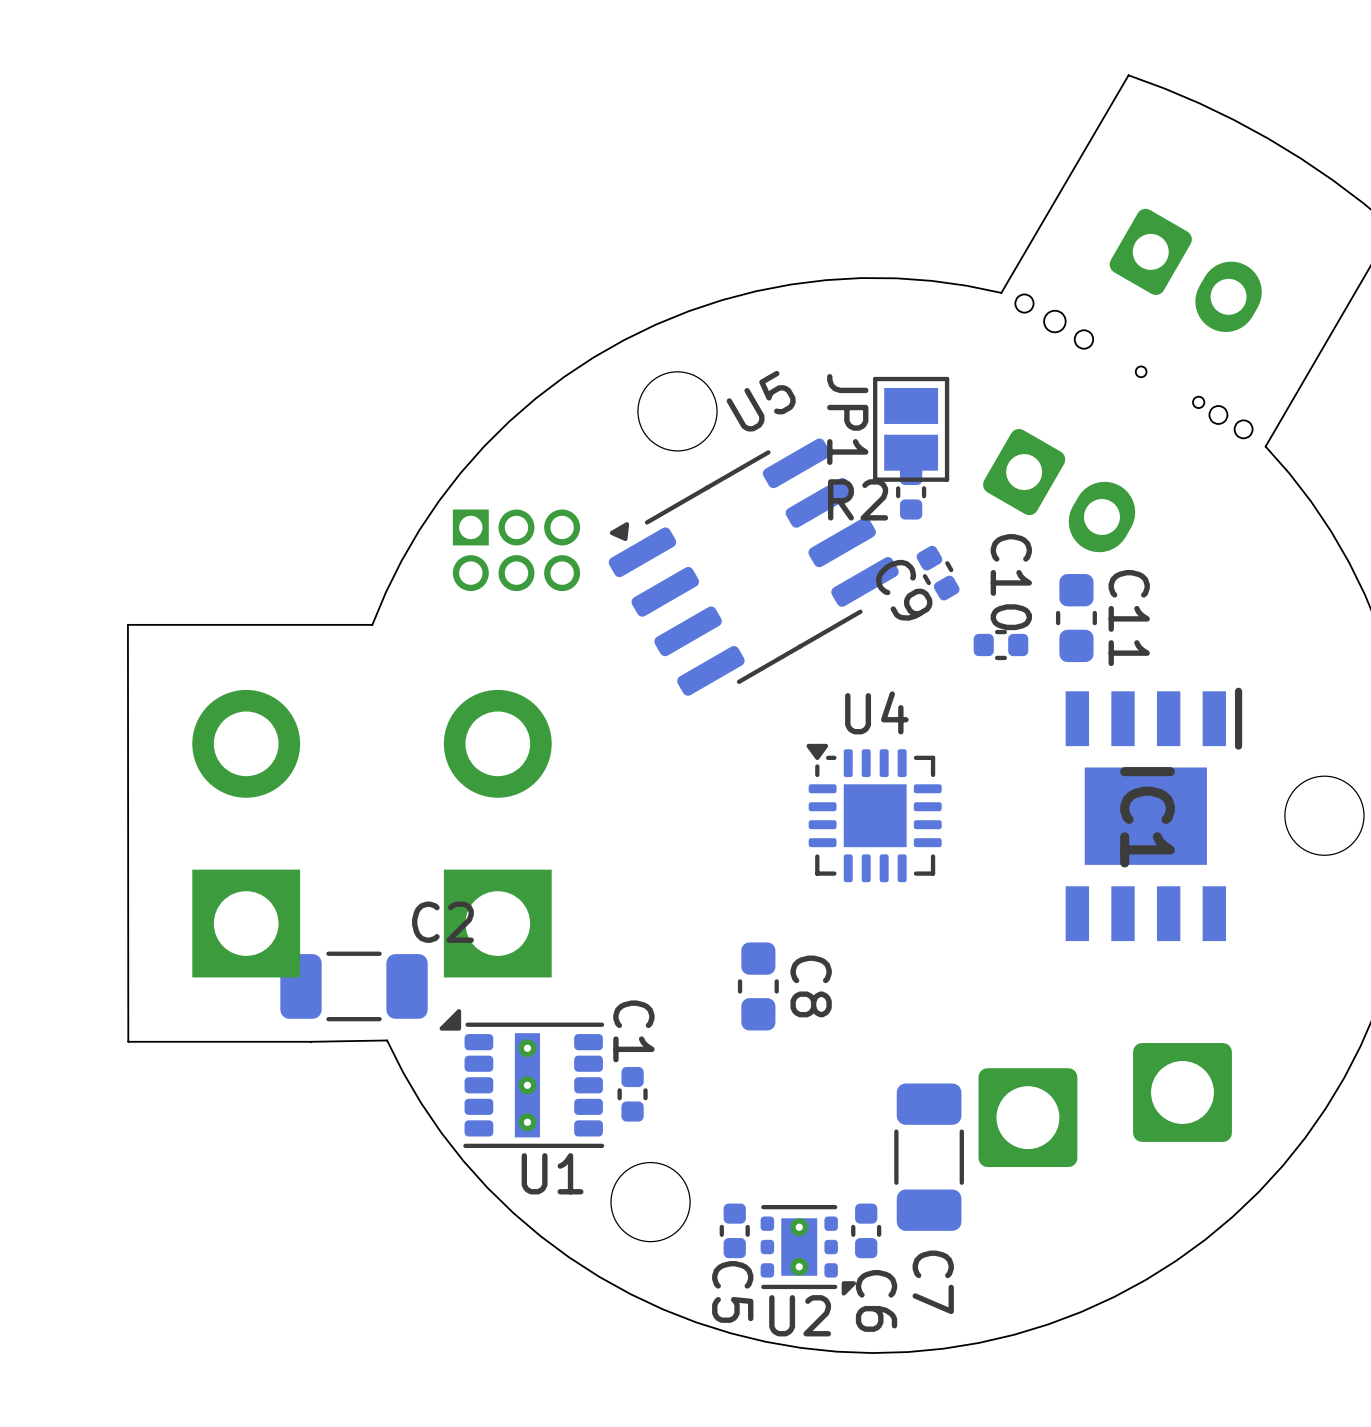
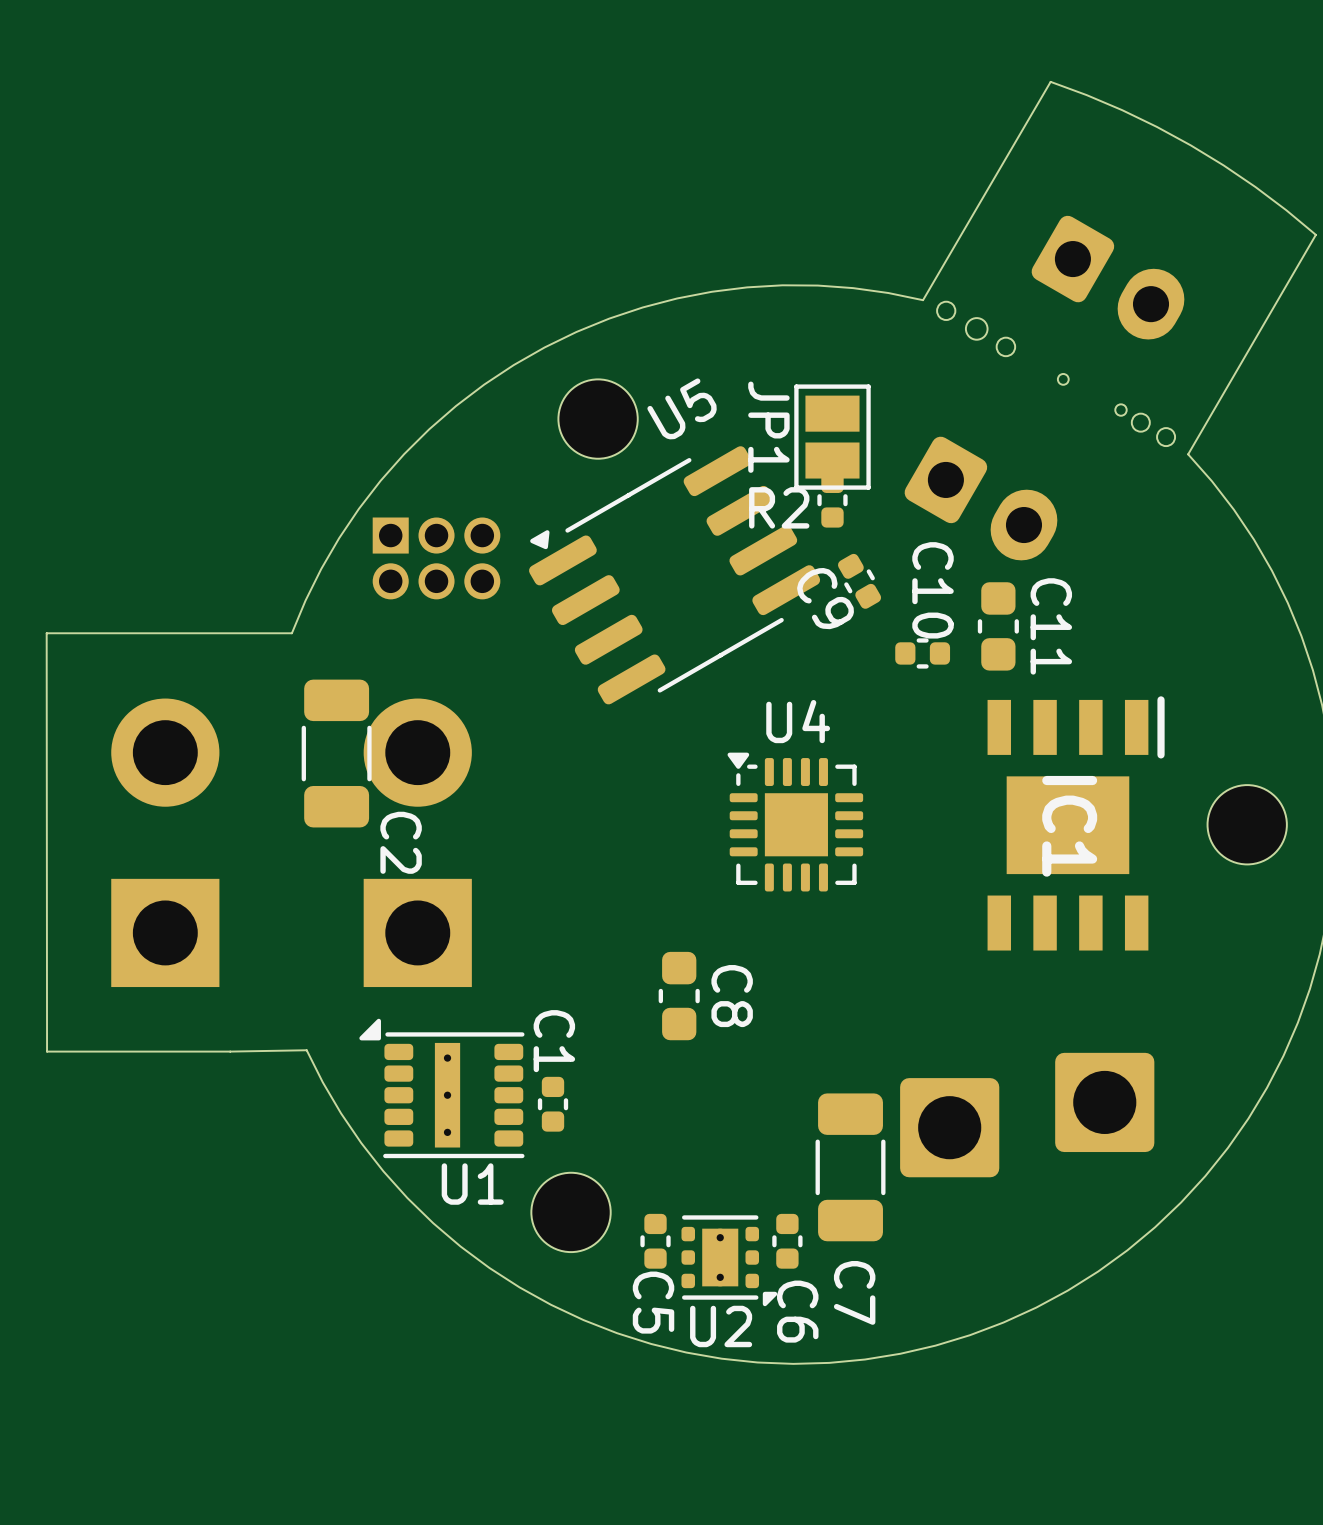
C2 rotation: 0° (354, 986) -> 90° clockwise (336, 753)
C2 position: (354, 986) -> (336, 753)

